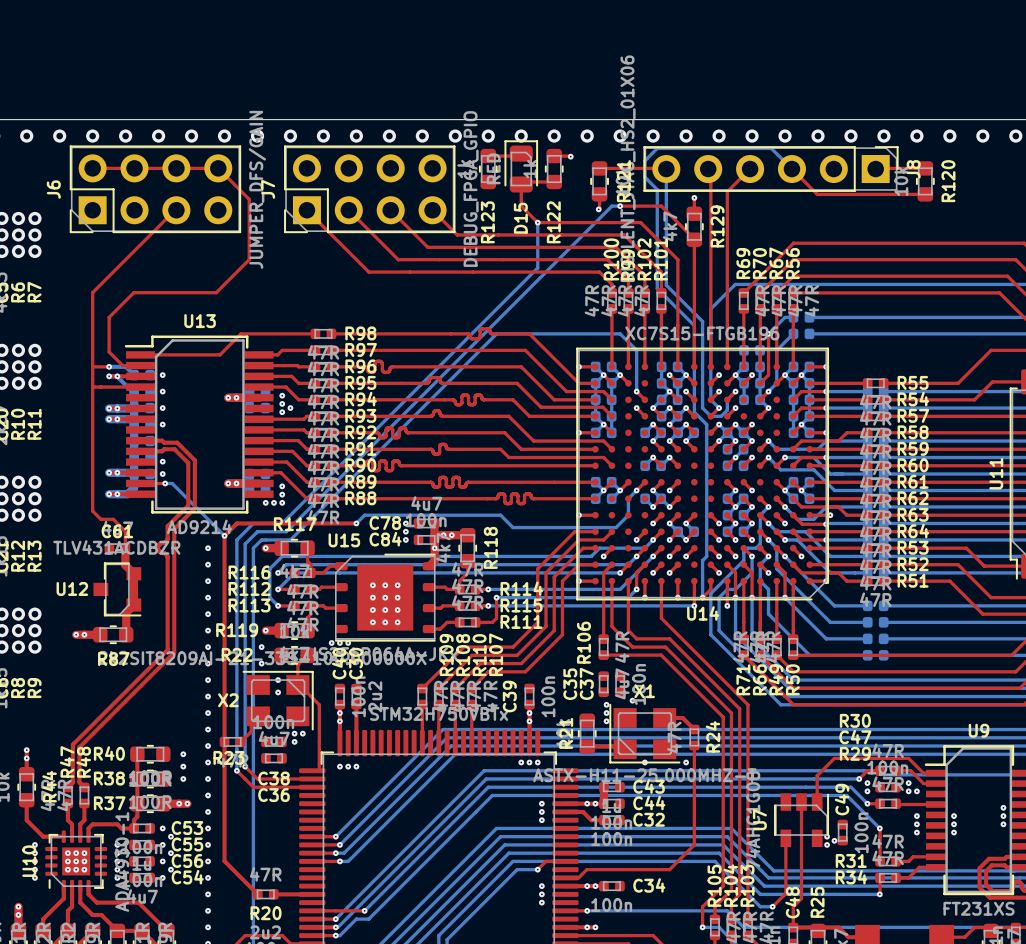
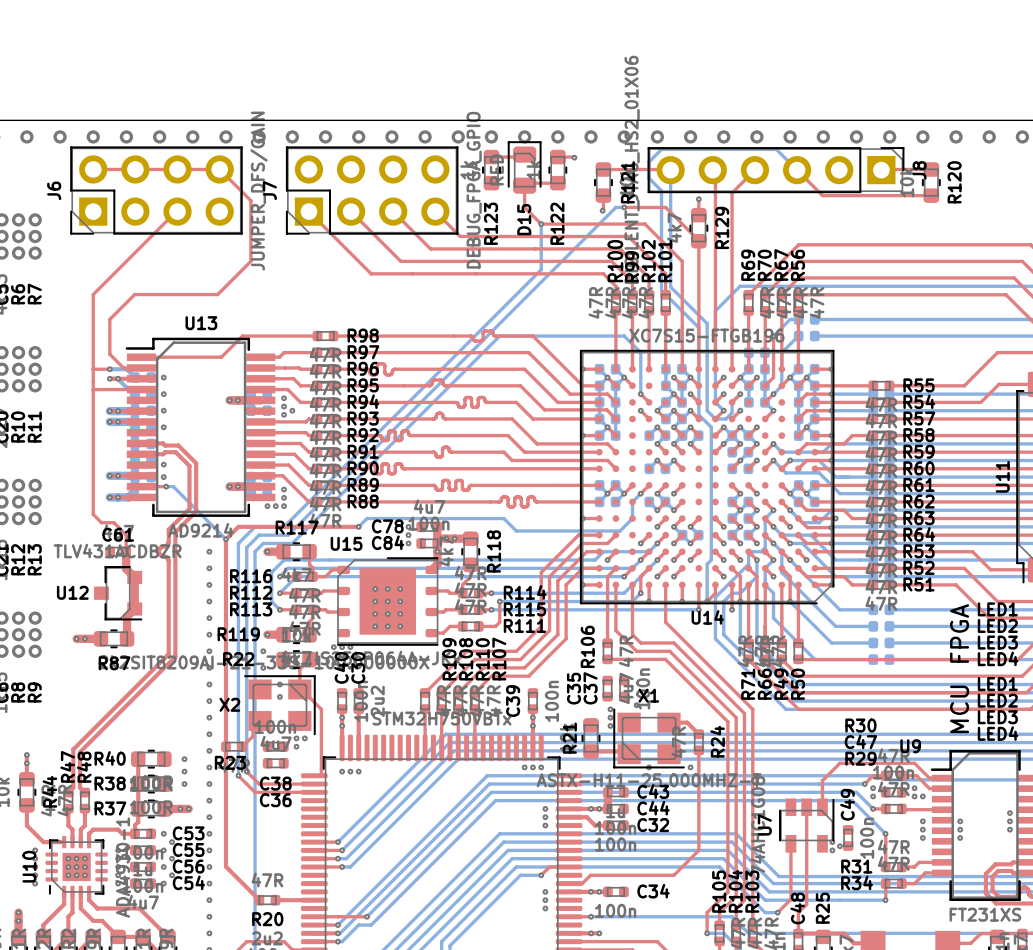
text: none -> LED1 (997, 609)
text: none -> LED2 (997, 625)
text: none -> FPGA (959, 633)
text: none -> LED3 (997, 642)
text: none -> LED4 (998, 658)
text: none -> LED1 (997, 684)
text: none -> LED2 (997, 700)
text: none -> MCU (959, 709)
text: none -> LED3 (997, 717)
text: none -> LED4 (998, 733)
U9 name position: U9 (979, 730) -> U9 (910, 746)

